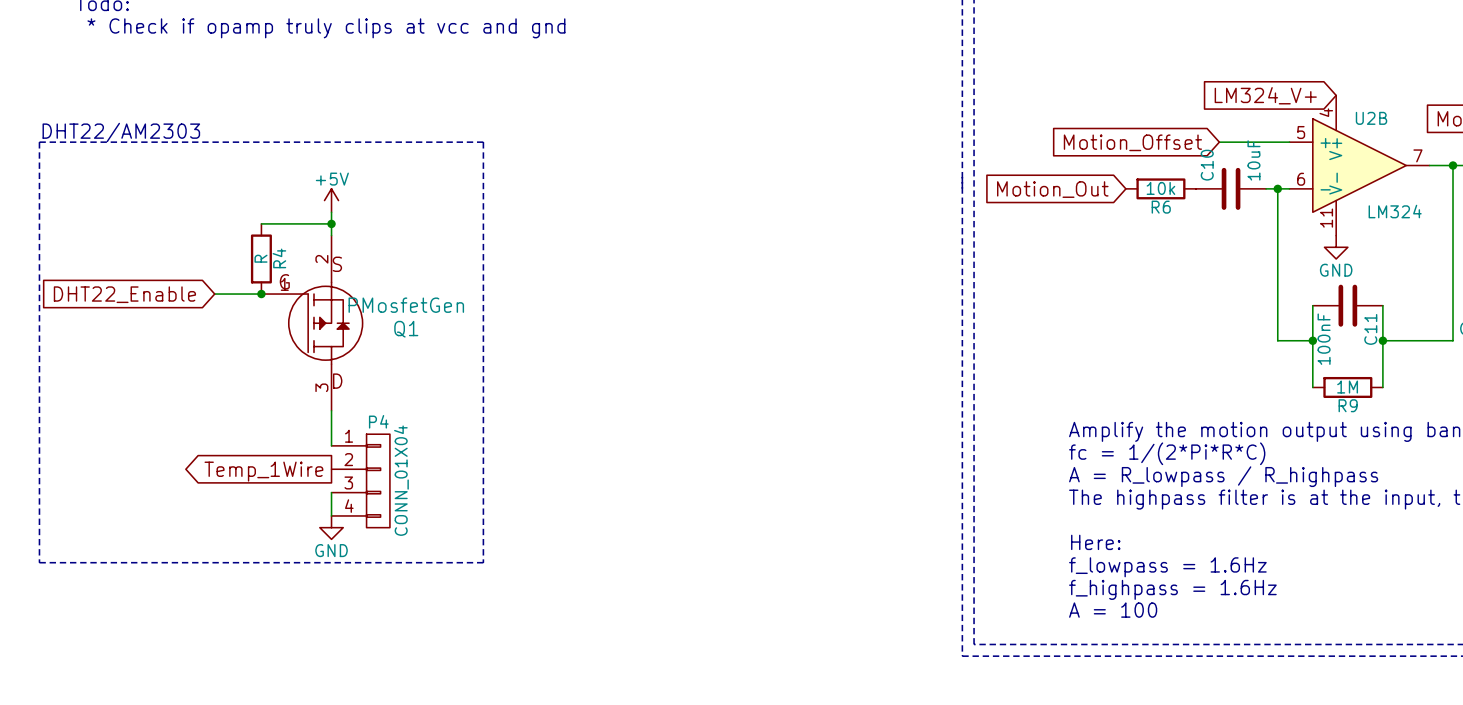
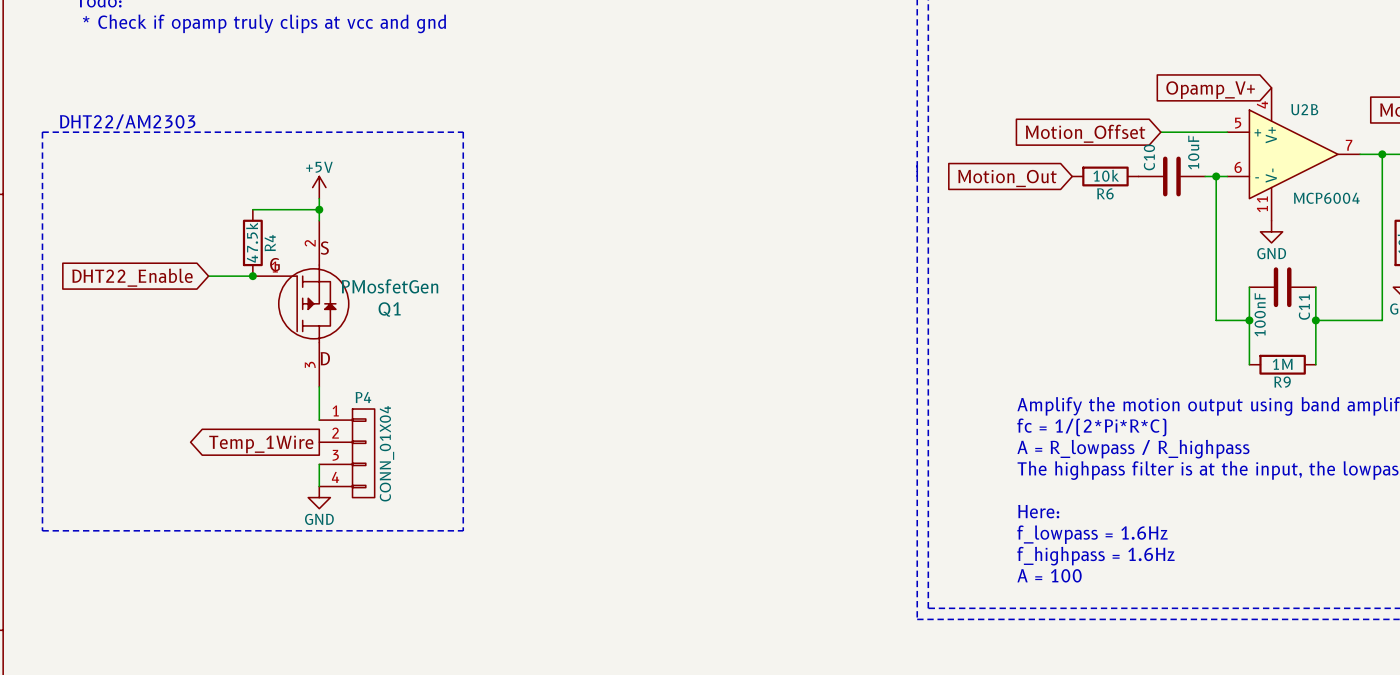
global label: LM324_V+ (1265, 95) -> Opamp_V+ (1210, 90)
U2B value: LM324 (1395, 211) -> MCP6004 (1326, 198)
R4 value: R (260, 258) -> 47.5k (252, 242)

